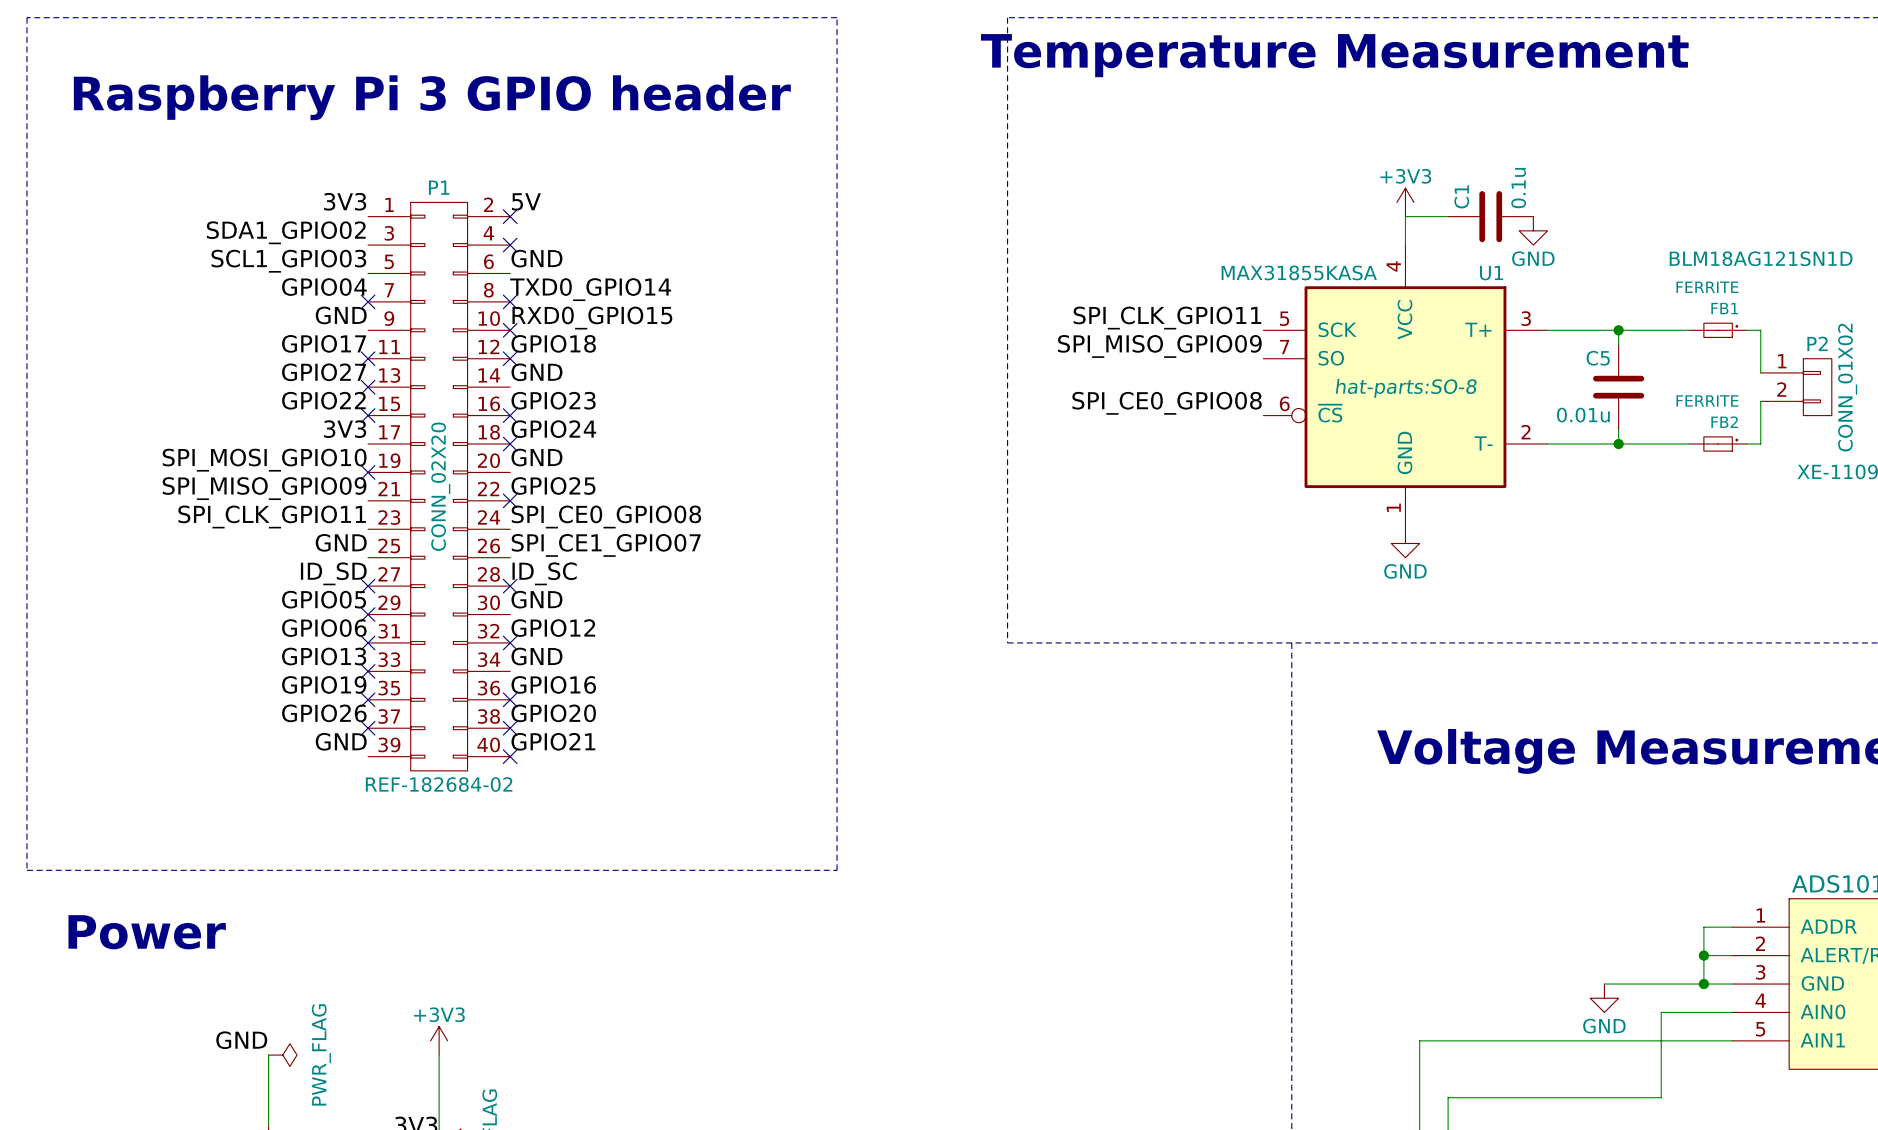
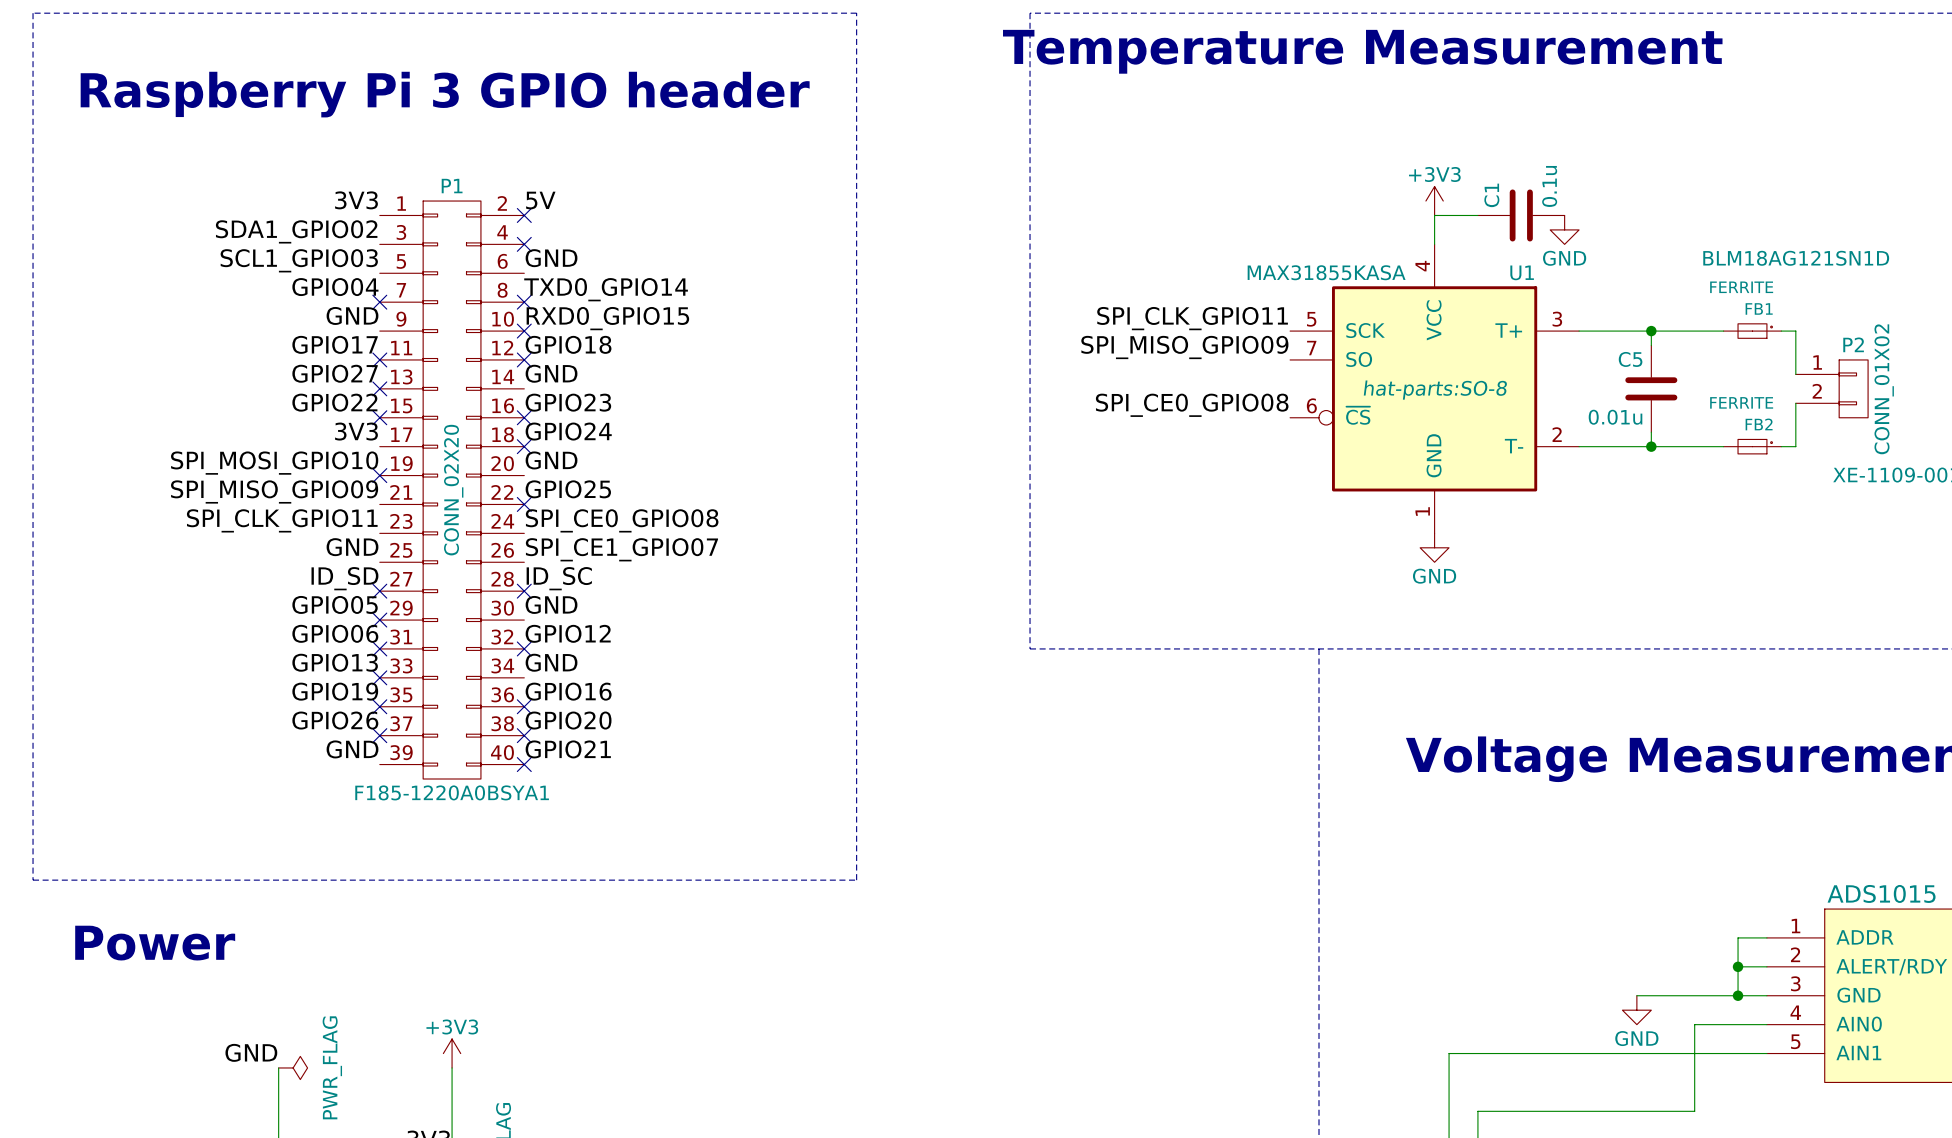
P1 text: none -> F185-1220A0BSYA1 (452, 792)
P1 text: REF-182684-02 (439, 784) -> none

